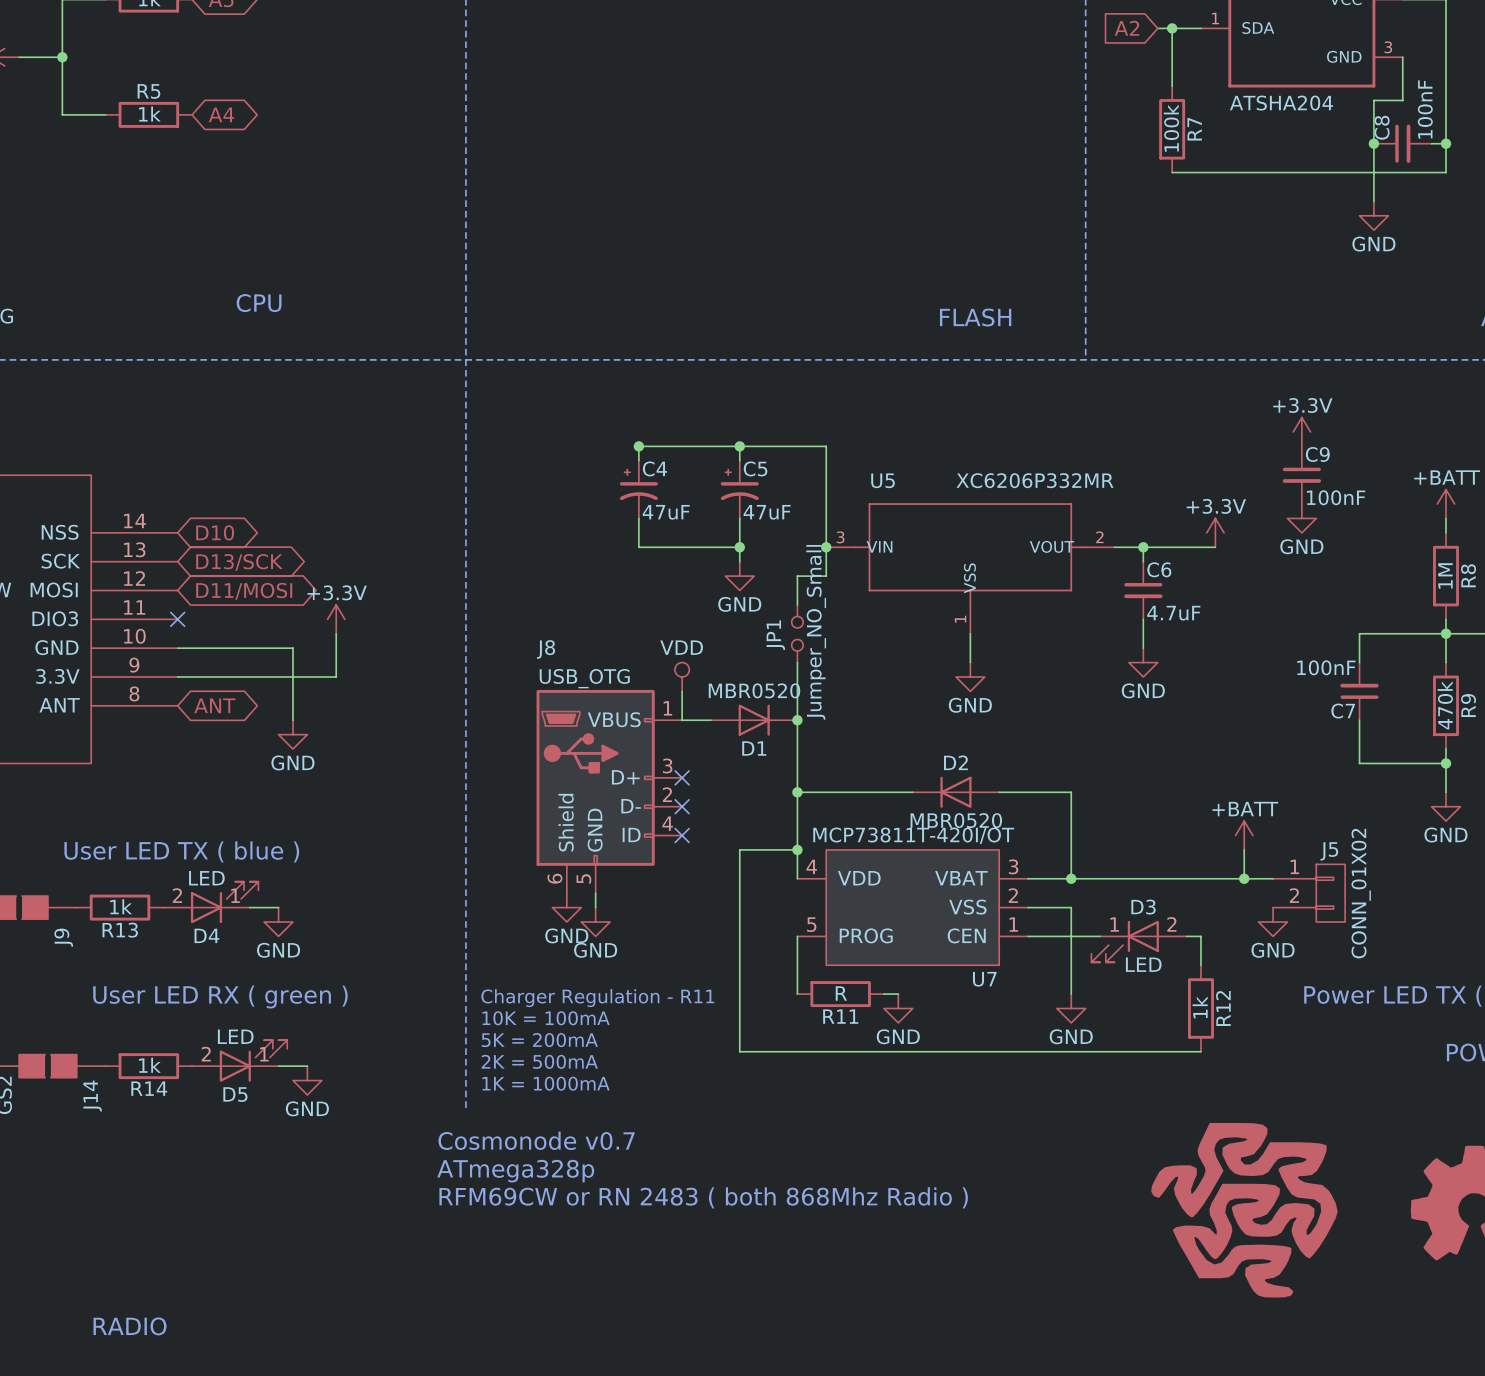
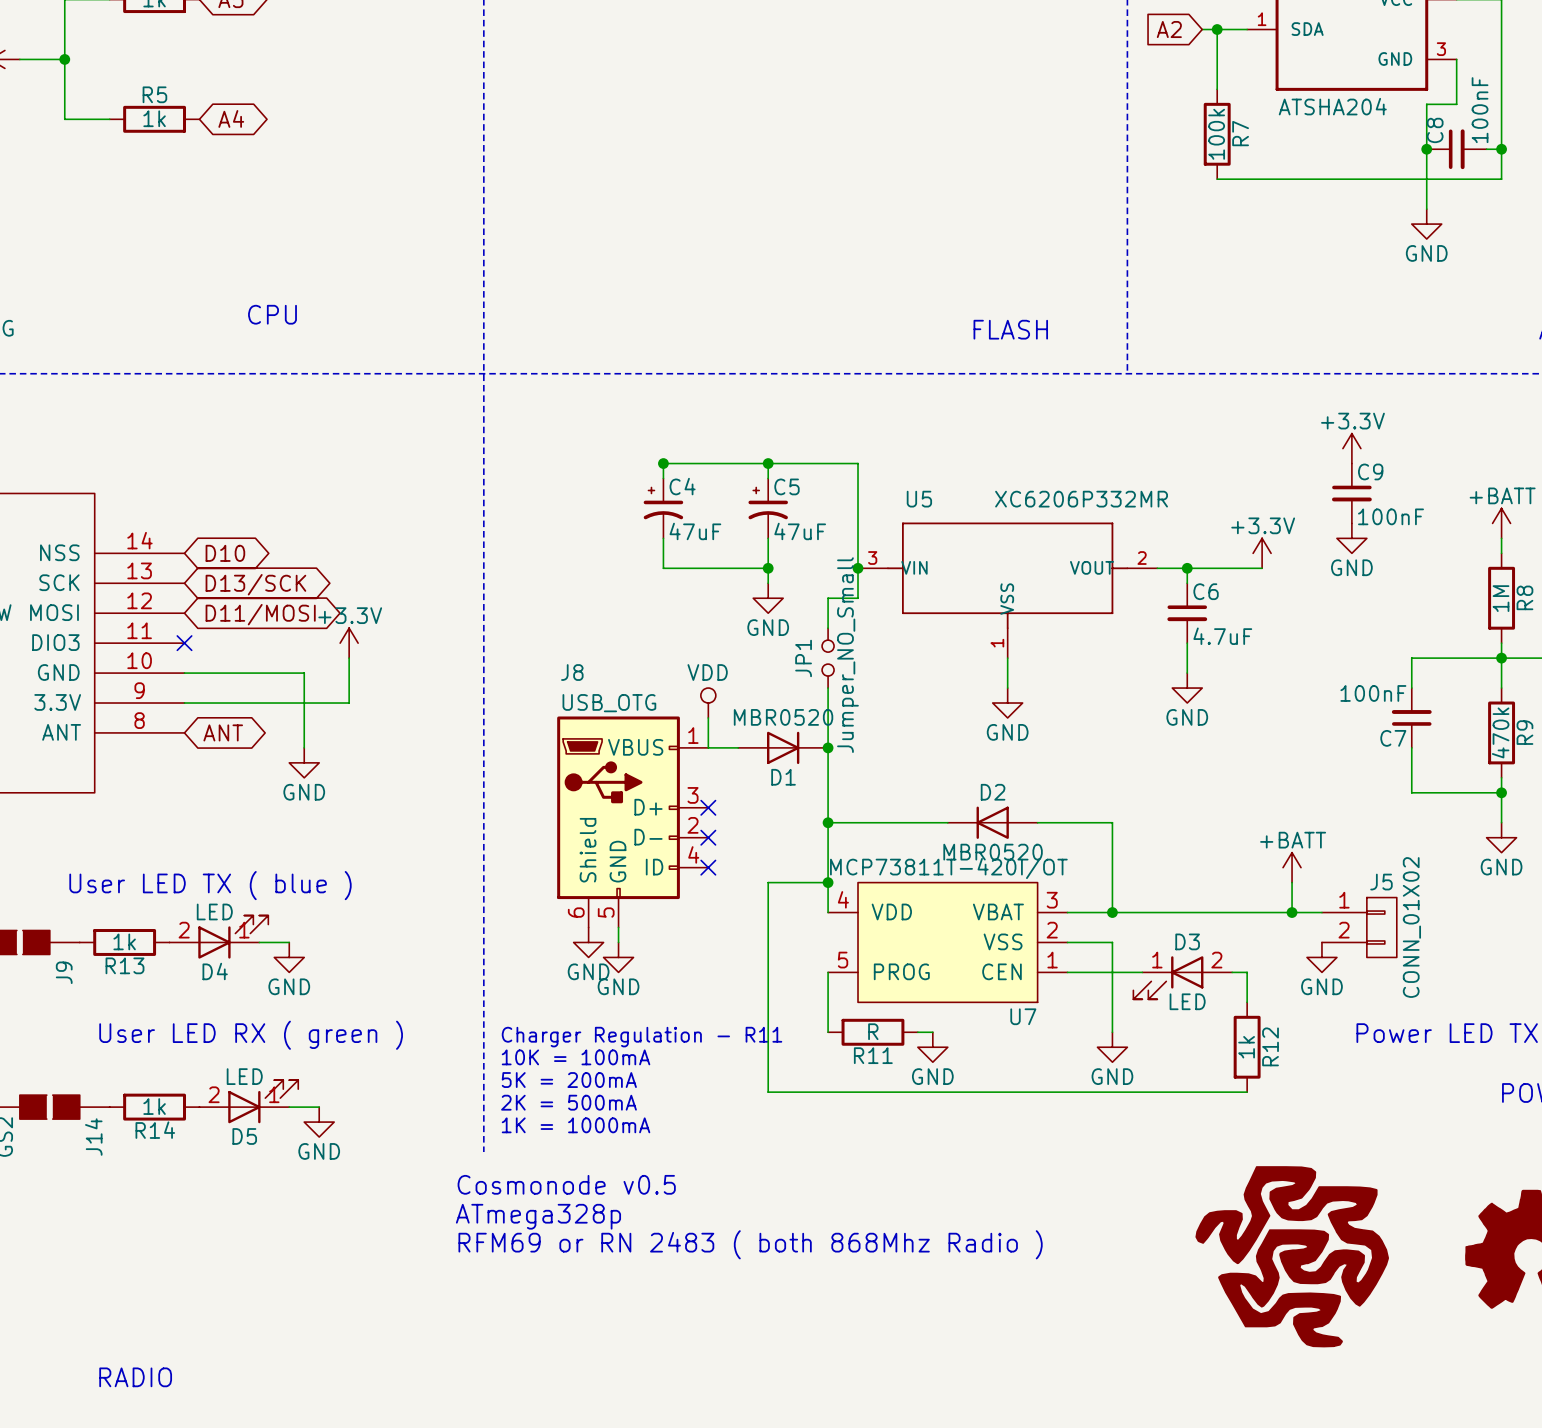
text: Cosmonode v0.7 (536, 1140) -> Cosmonode v0.5 (566, 1184)
text: RFM69CW or RN 2483 ( both 868Mhz Radio ) (703, 1197) -> RFM69 or RN 2483 ( both 868Mhz Radio ) (750, 1244)

